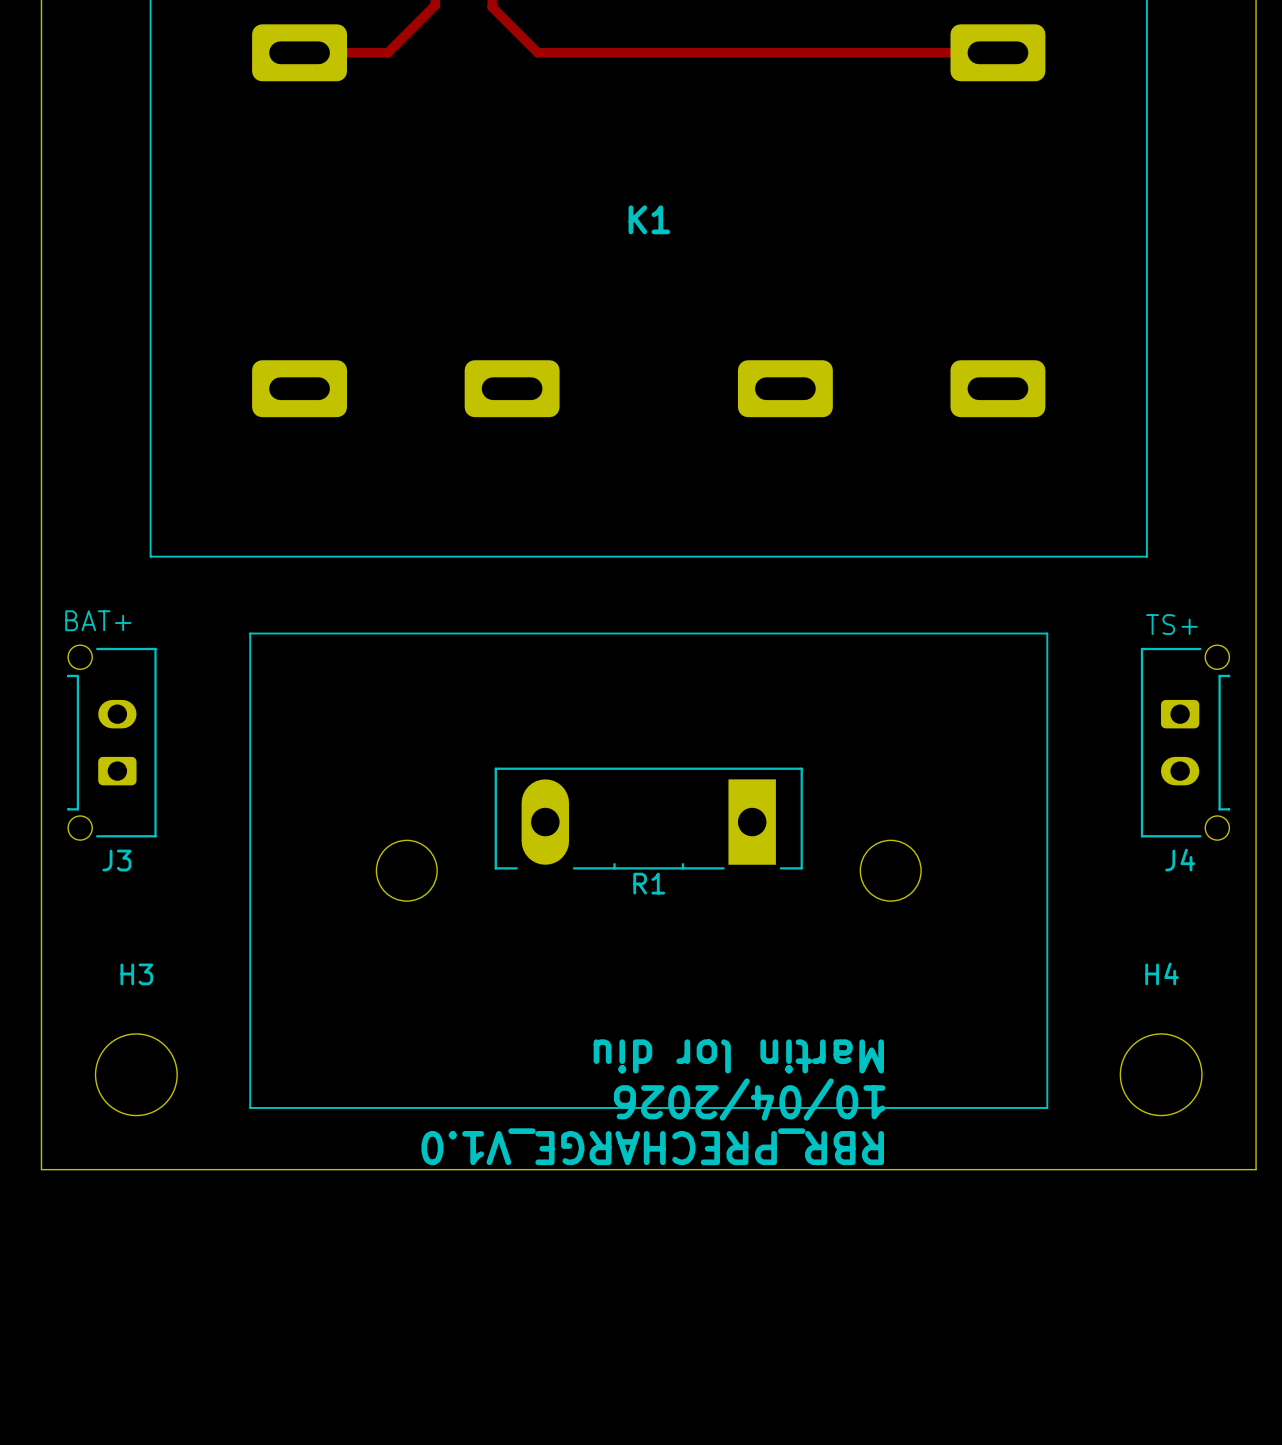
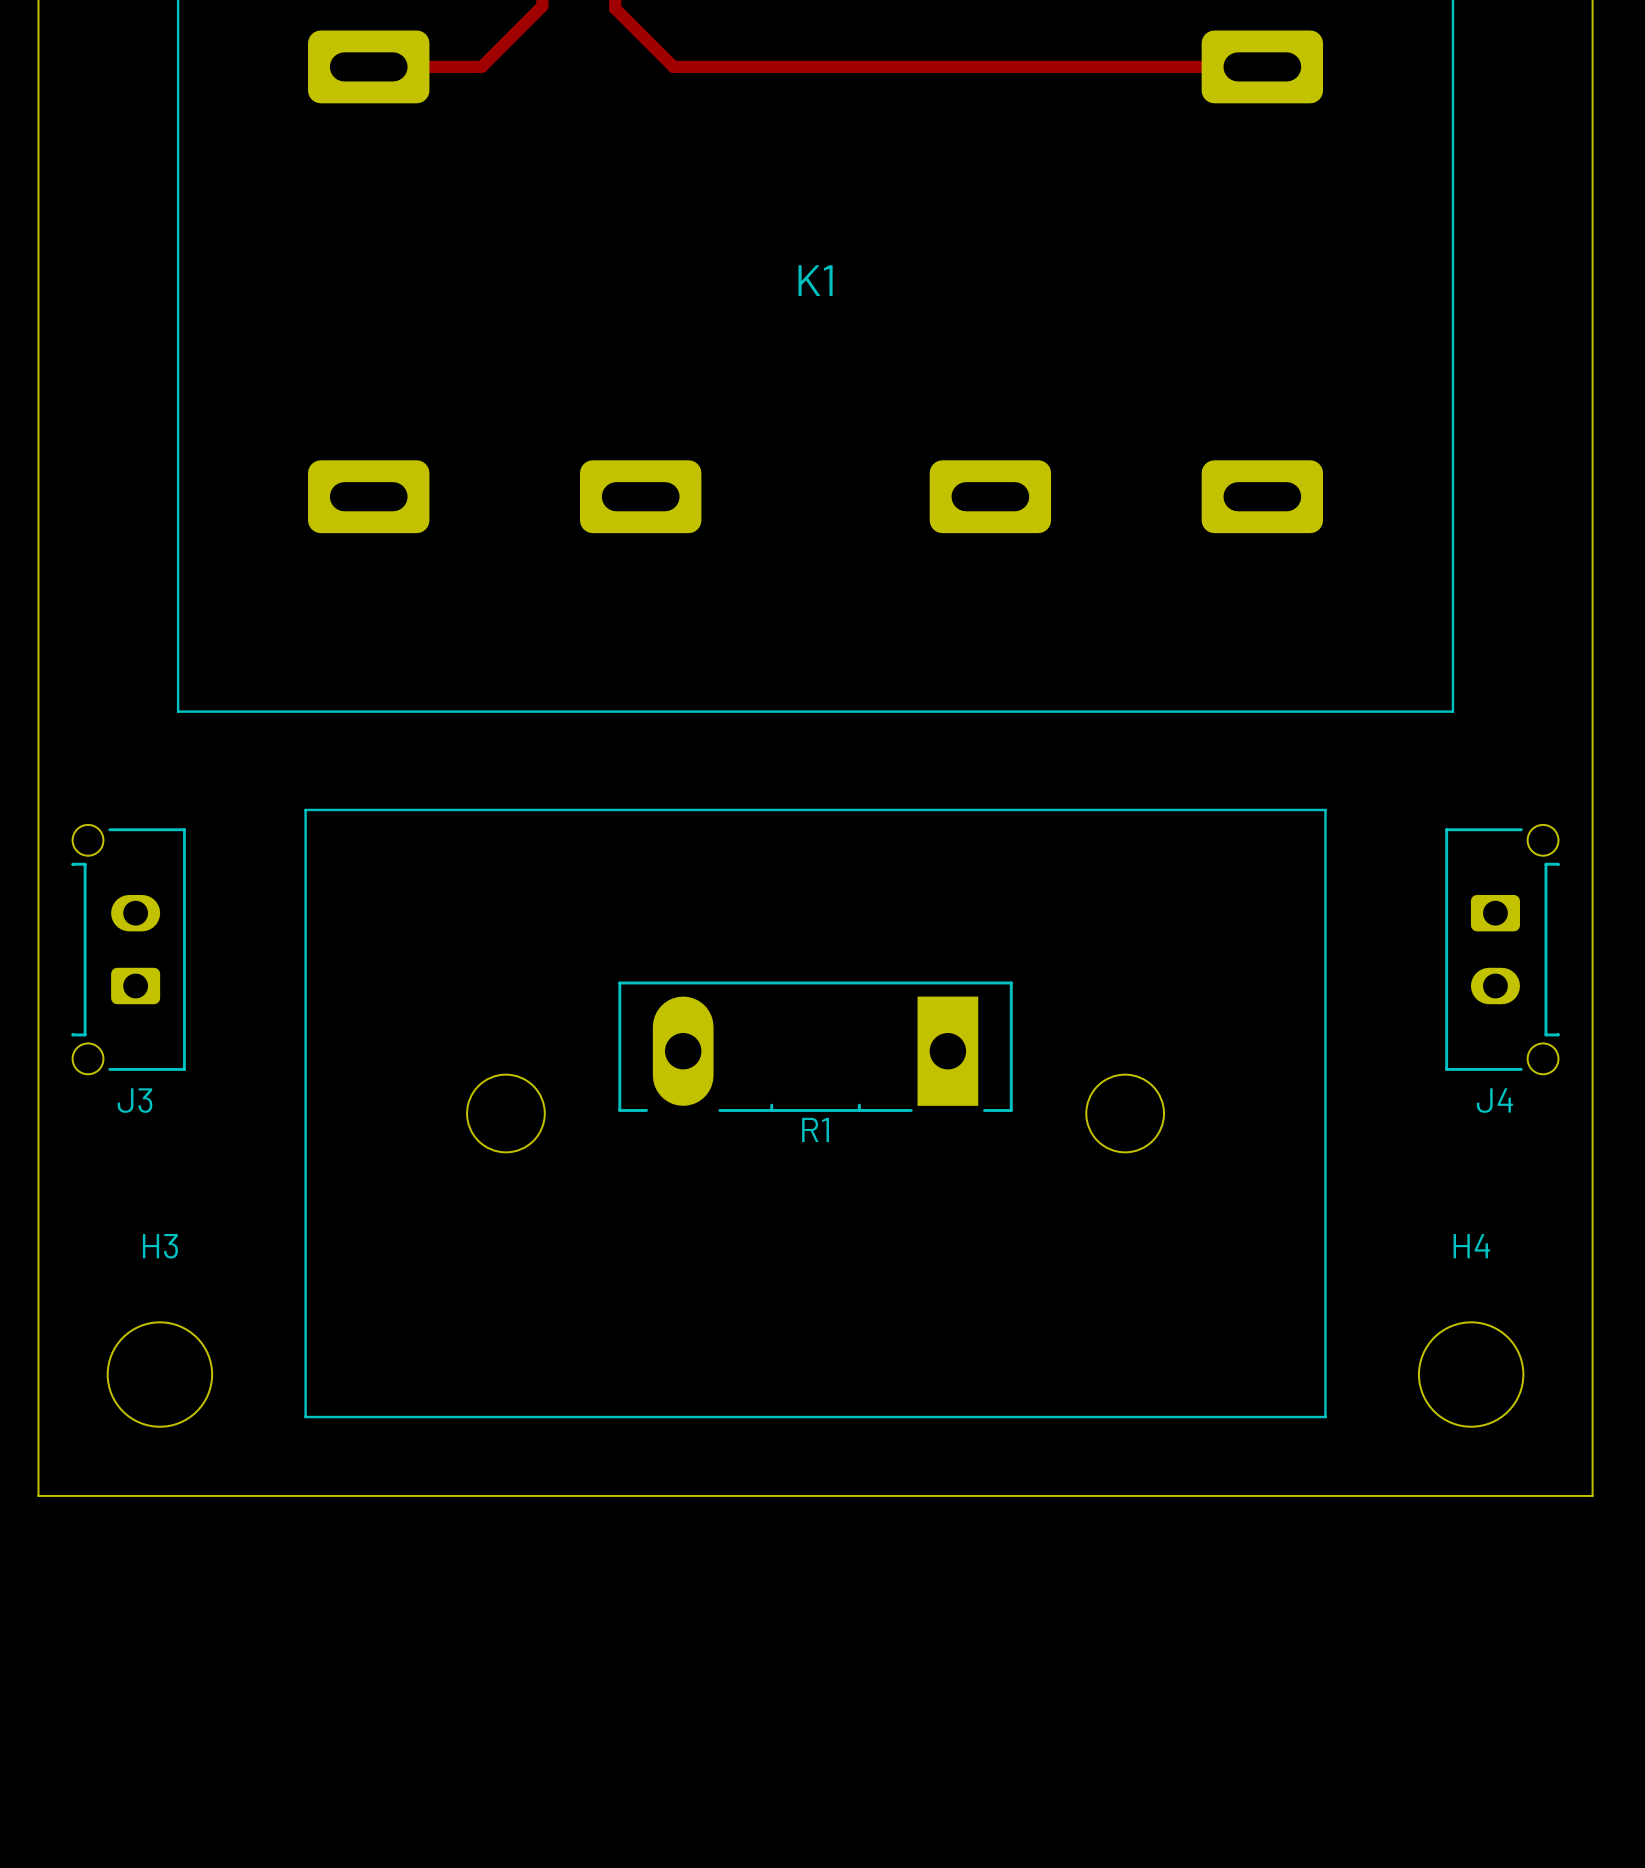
text: BAT+ (98, 620) -> none
text: TS+ (1171, 624) -> none
text: Martin lor diu (738, 1056) -> none
text: 10/04/2026 (749, 1099) -> none
text: RBR_PRECHARGE_V1.0 (652, 1146) -> none

